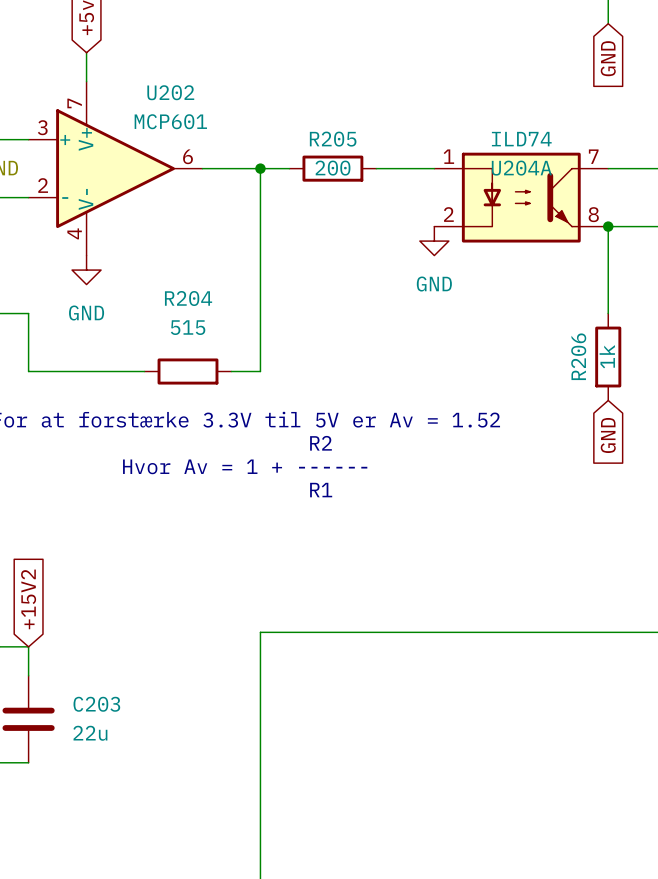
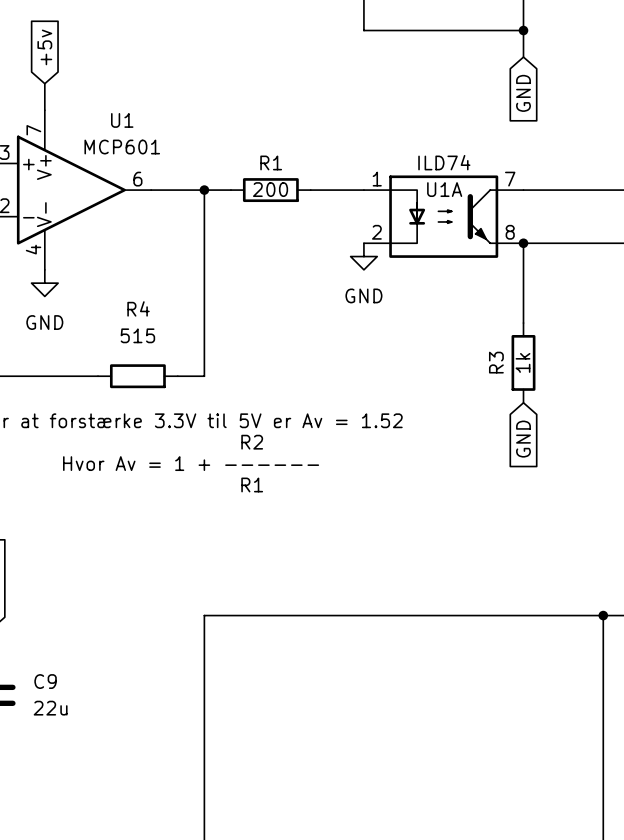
U202 name: U202 (170, 92) -> U1 (122, 120)
R205 name: R205 (333, 139) -> R1 (271, 162)
U204A name: U204A (521, 168) -> U1A (444, 189)
R204 name: R204 (188, 298) -> R4 (138, 308)
R206 name: R206 (578, 356) -> R3 (496, 362)
C203 name: C203 (96, 704) -> C9 (45, 681)

